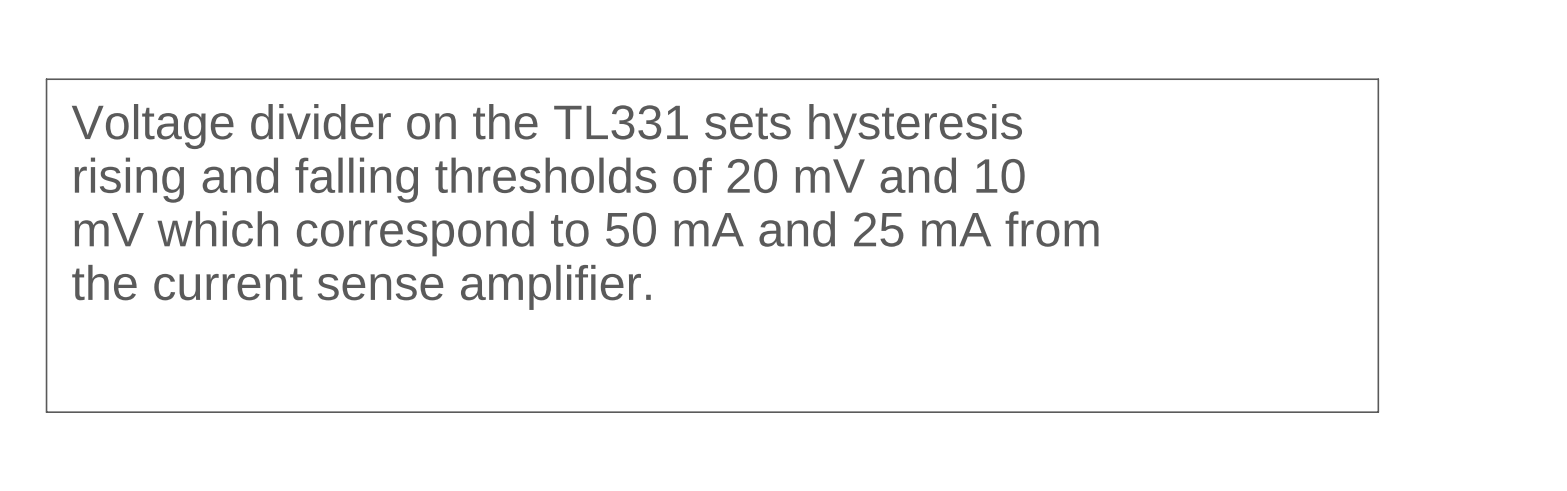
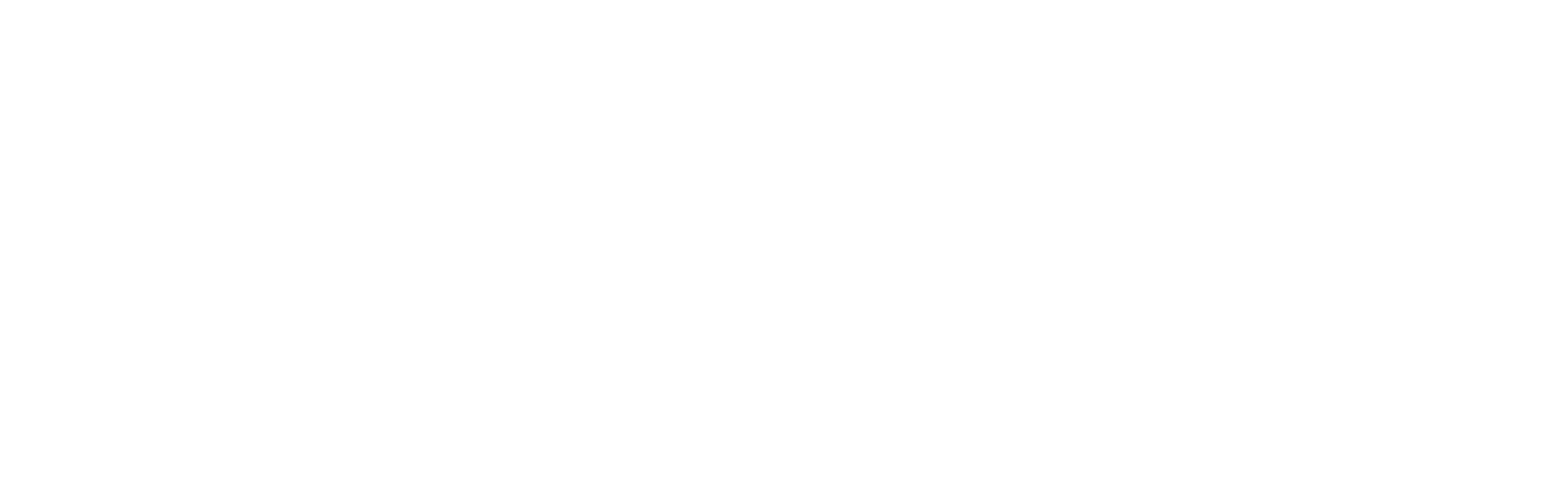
line: (46, 79) (1378, 79) (1378, 412) (46, 412) (46, 79) -> none
text: Voltage divider on the TL331 sets hysteresis (546, 126) -> none
text: rising and falling thresholds of 20 mV and 10 (549, 180) -> none
text: mV which correspond to 50 mA and 25 mA from (586, 233) -> none
text: the current sense amplifier. (361, 287) -> none

